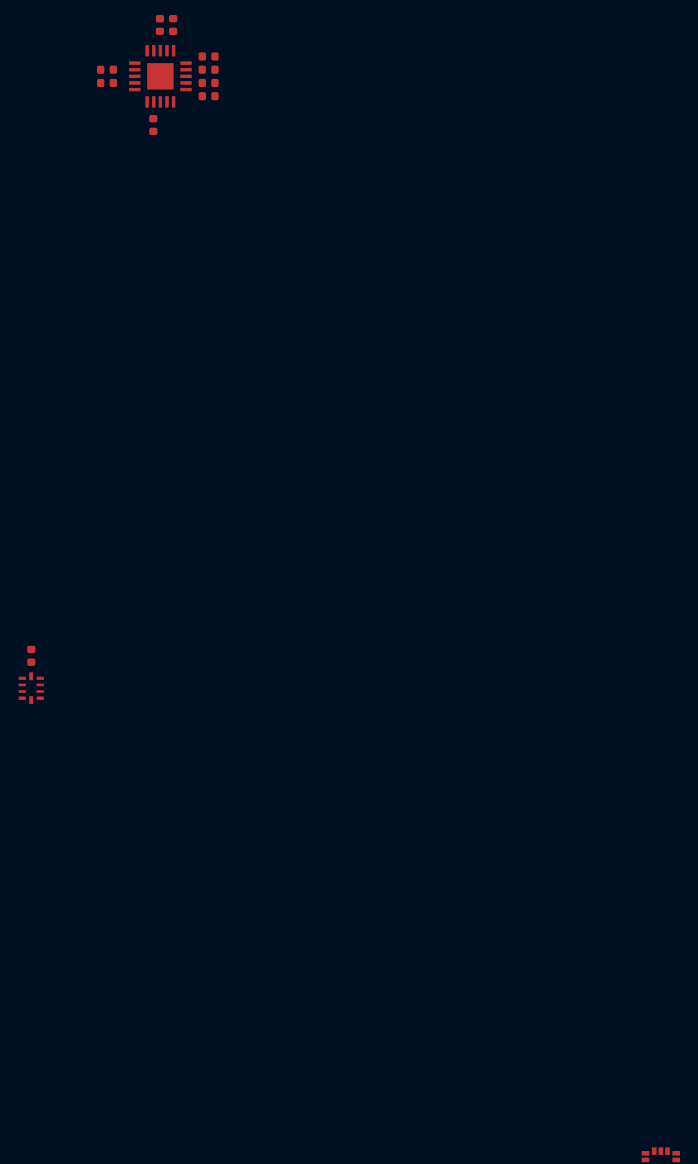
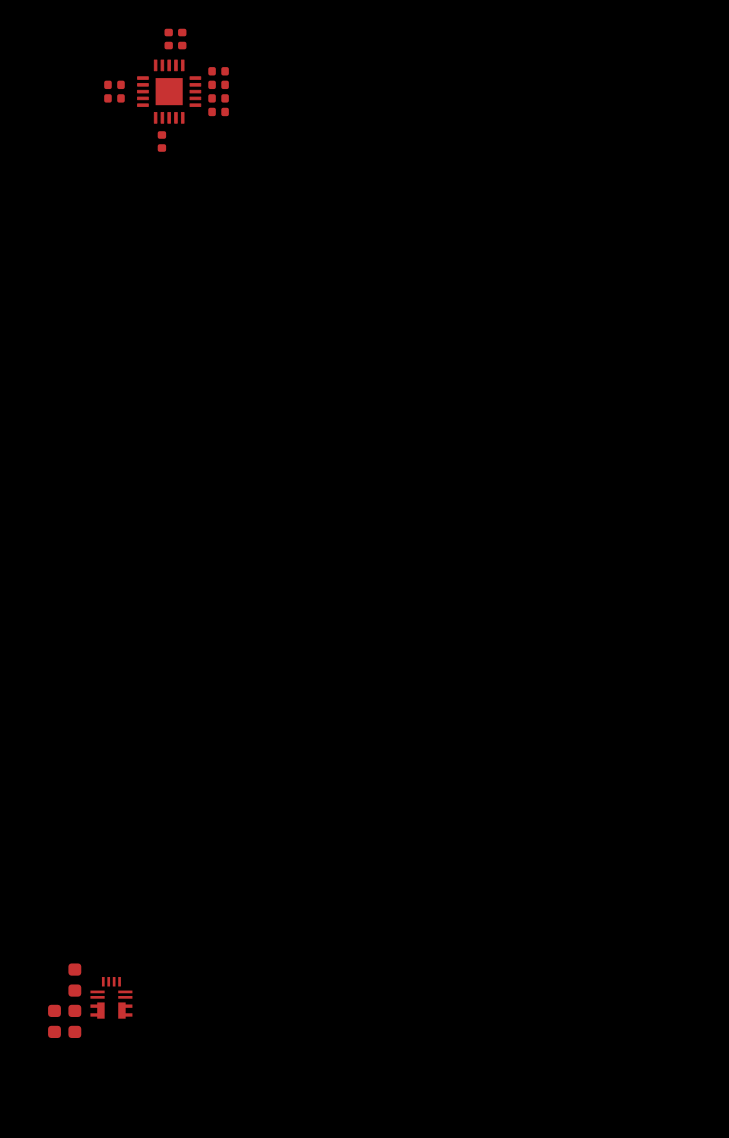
part: (31, 655) -> none
part: (31, 688) -> none
part: none -> (74, 980)
part: none -> (111, 997)
part: none -> (54, 1021)
part: none -> (74, 1021)

